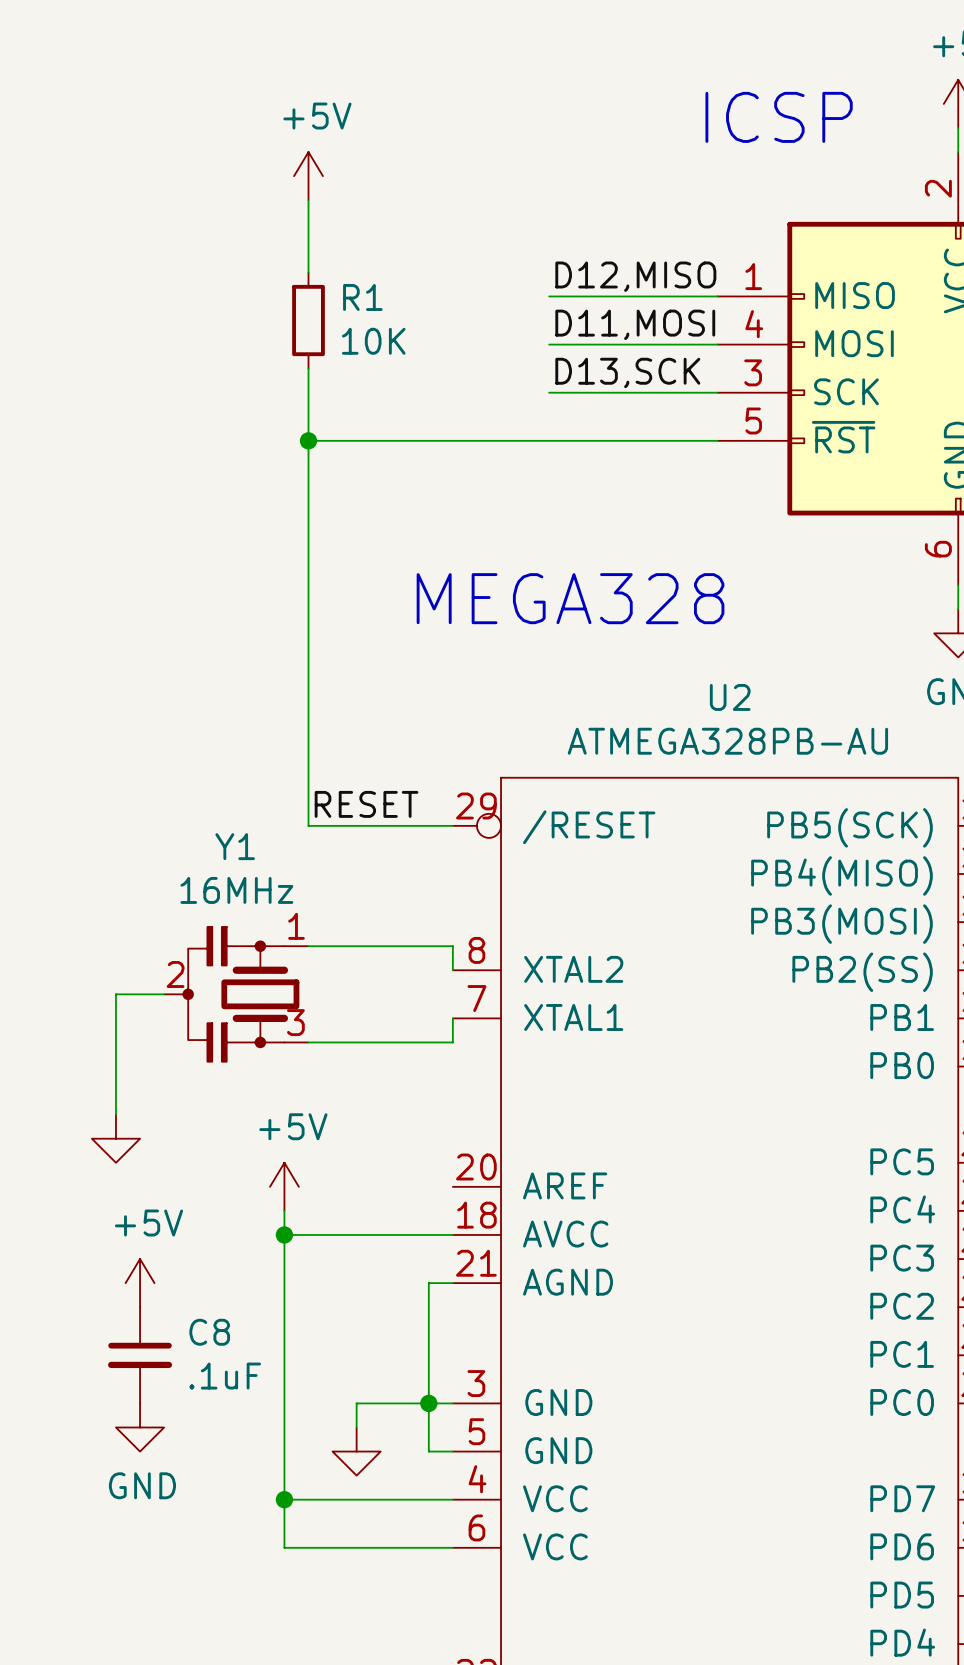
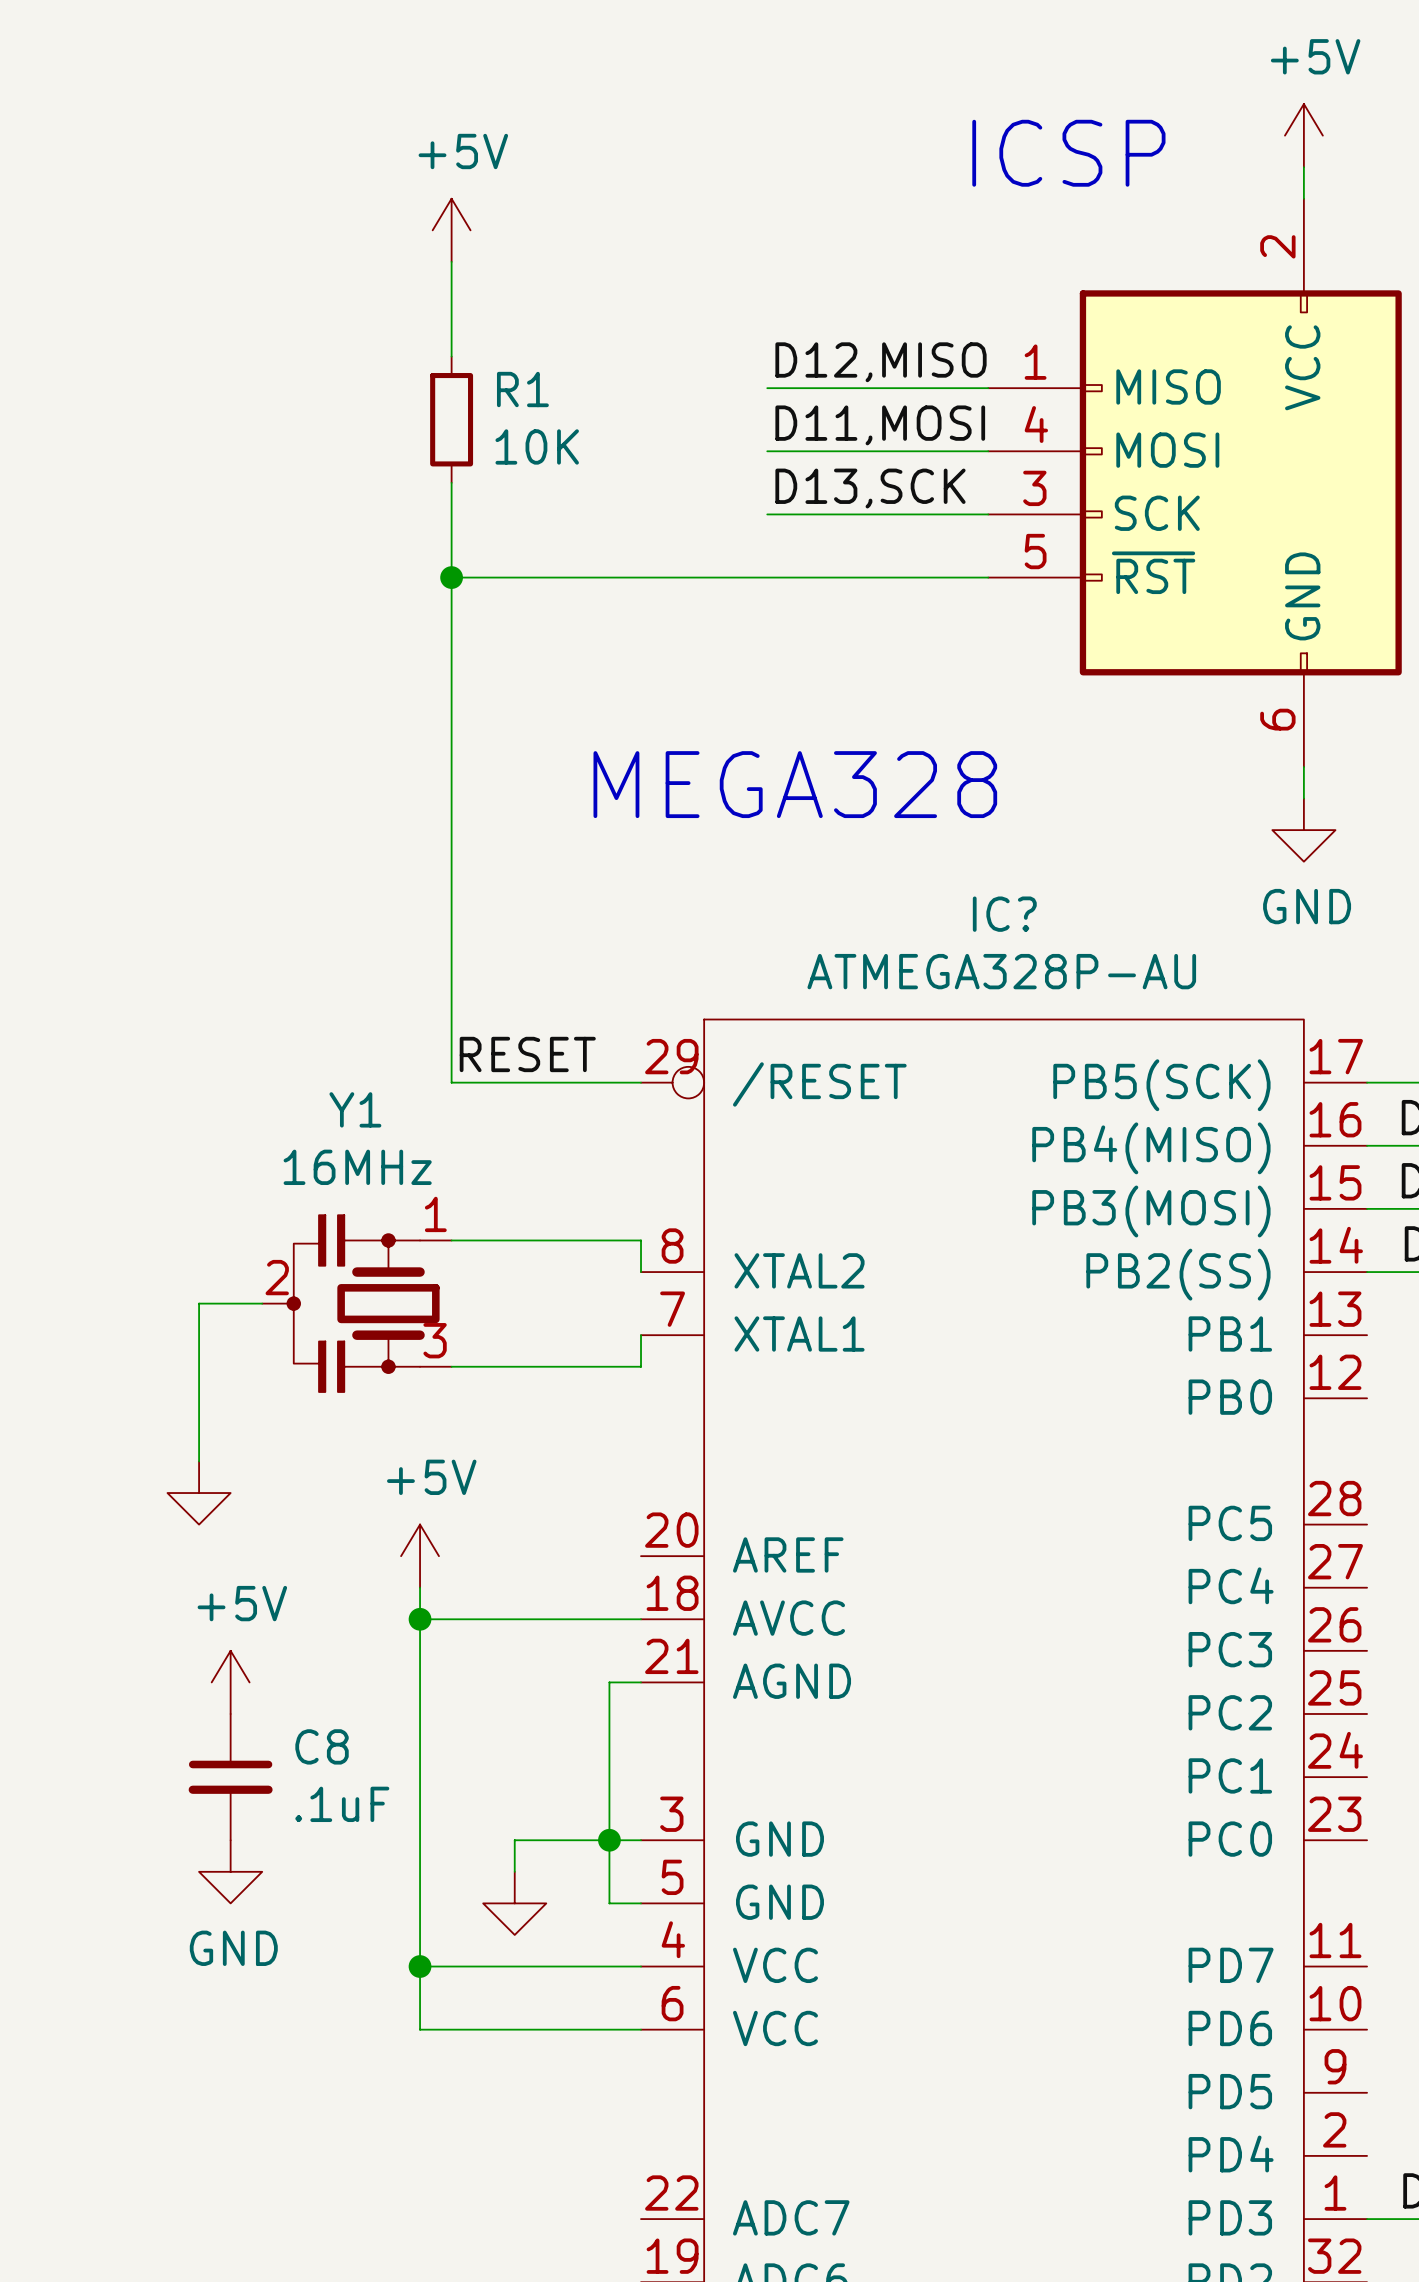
U2 name: U2 (730, 697) -> IC? (1004, 914)
U2 value: ATMEGA328PB-AU (727, 741) -> ATMEGA328P-AU (1001, 971)

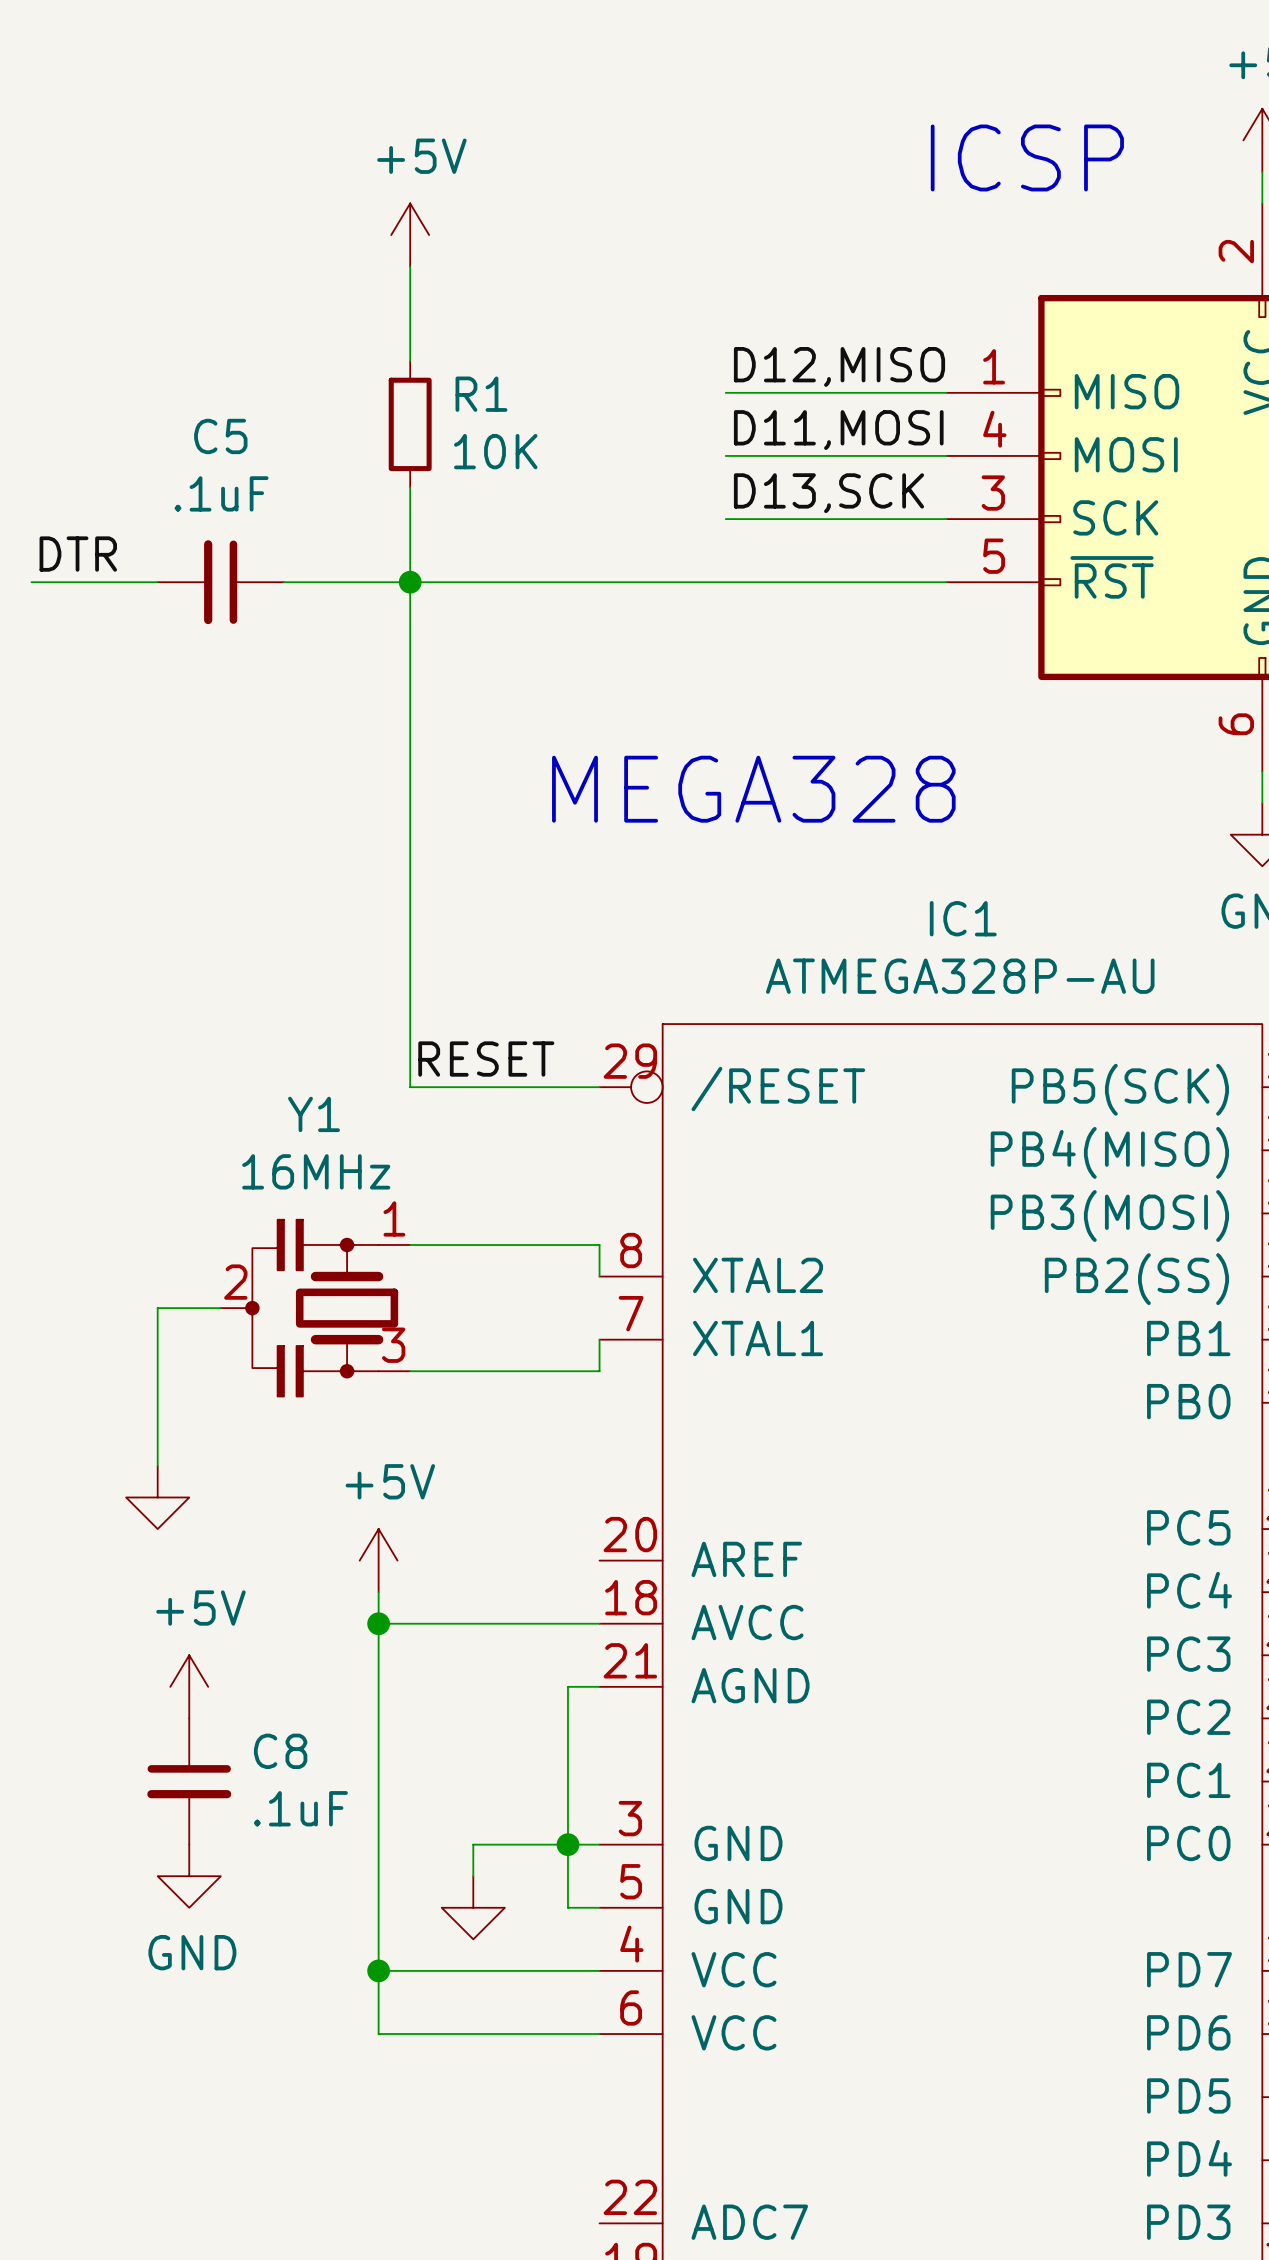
label: none -> DTR (78, 554)
wire: none -> (31, 582) (157, 582)
C5: none -> .1uF (220, 582)
wire: none -> (283, 582) (410, 582)
IC? name: IC? (1004, 914) -> IC1 (963, 918)

